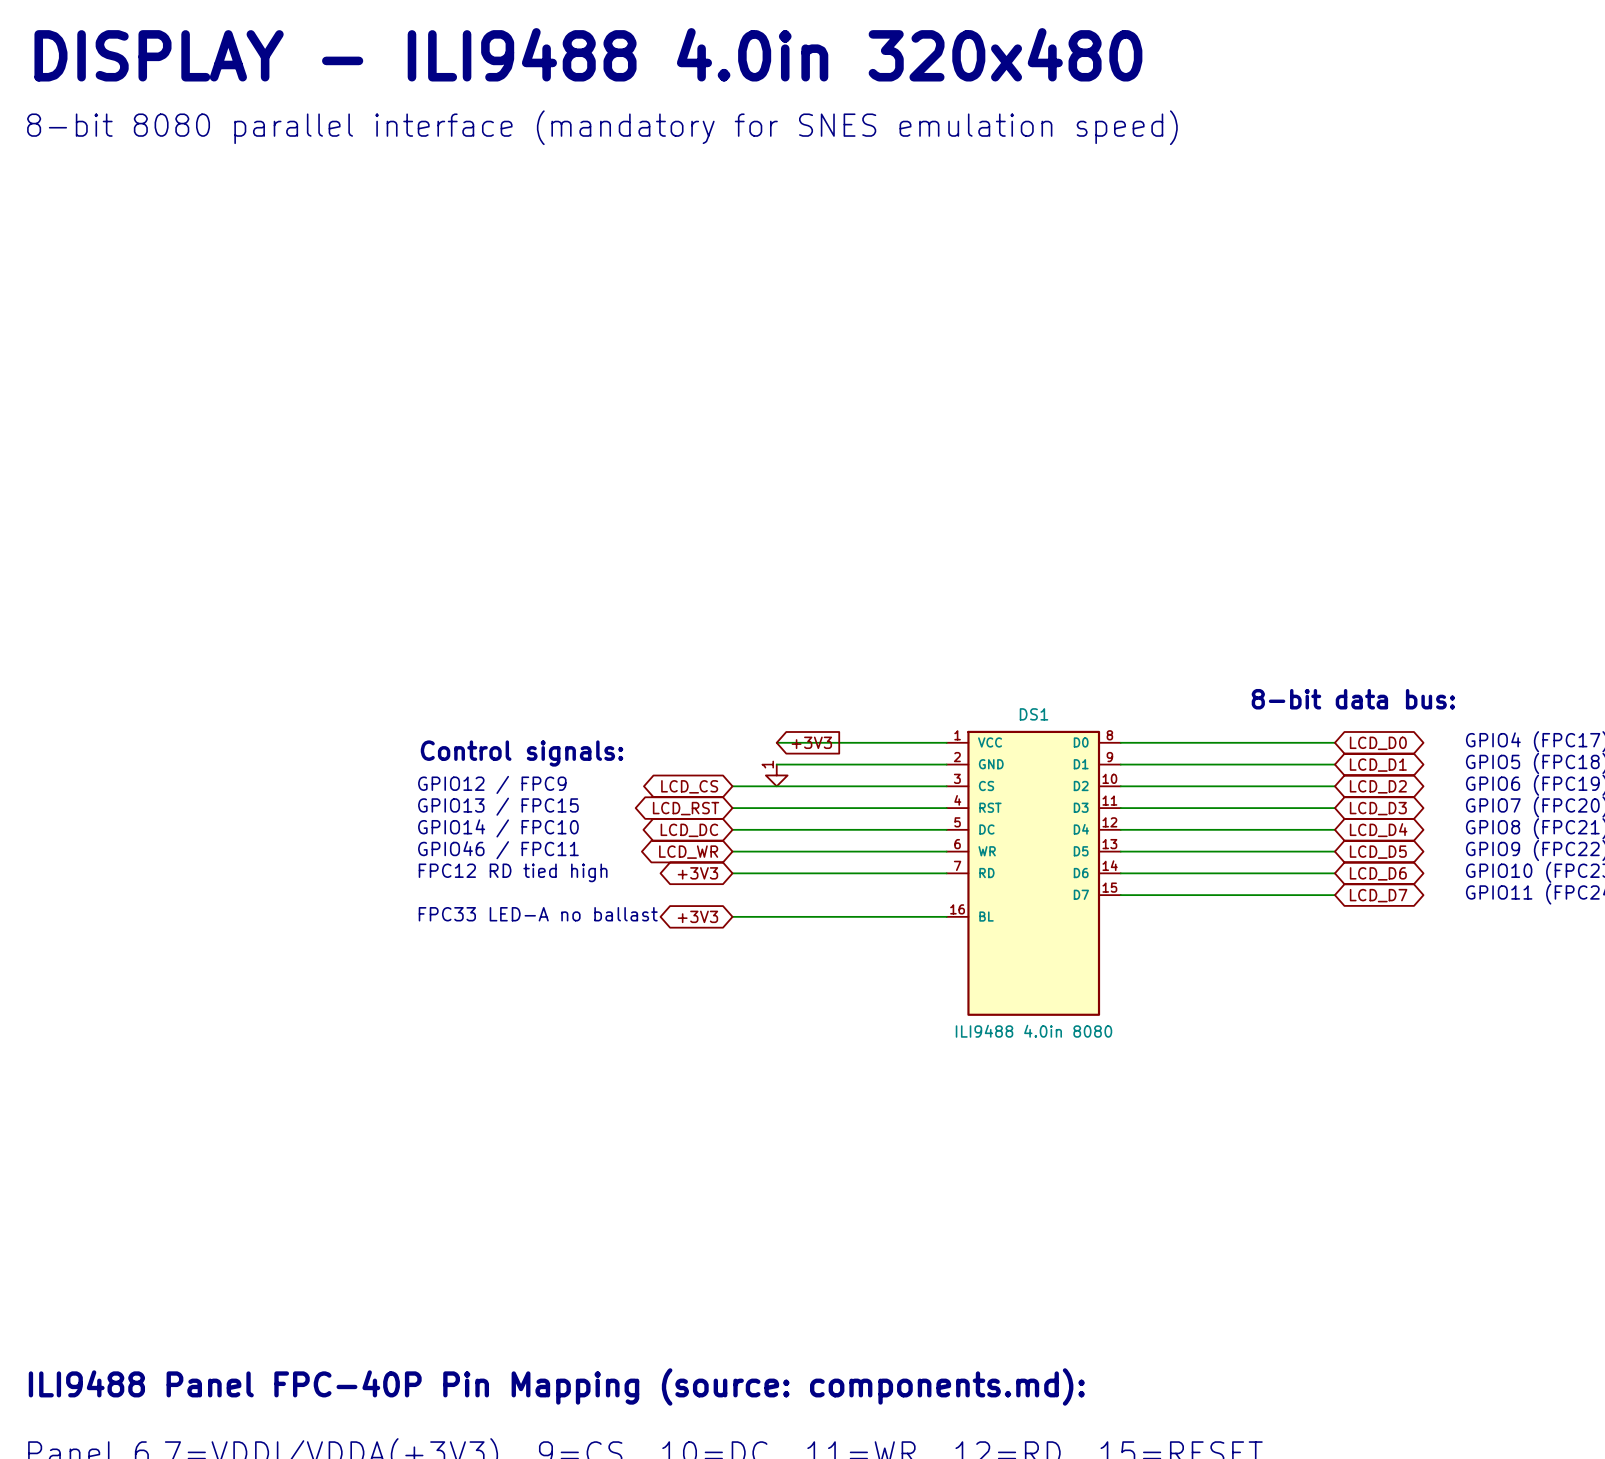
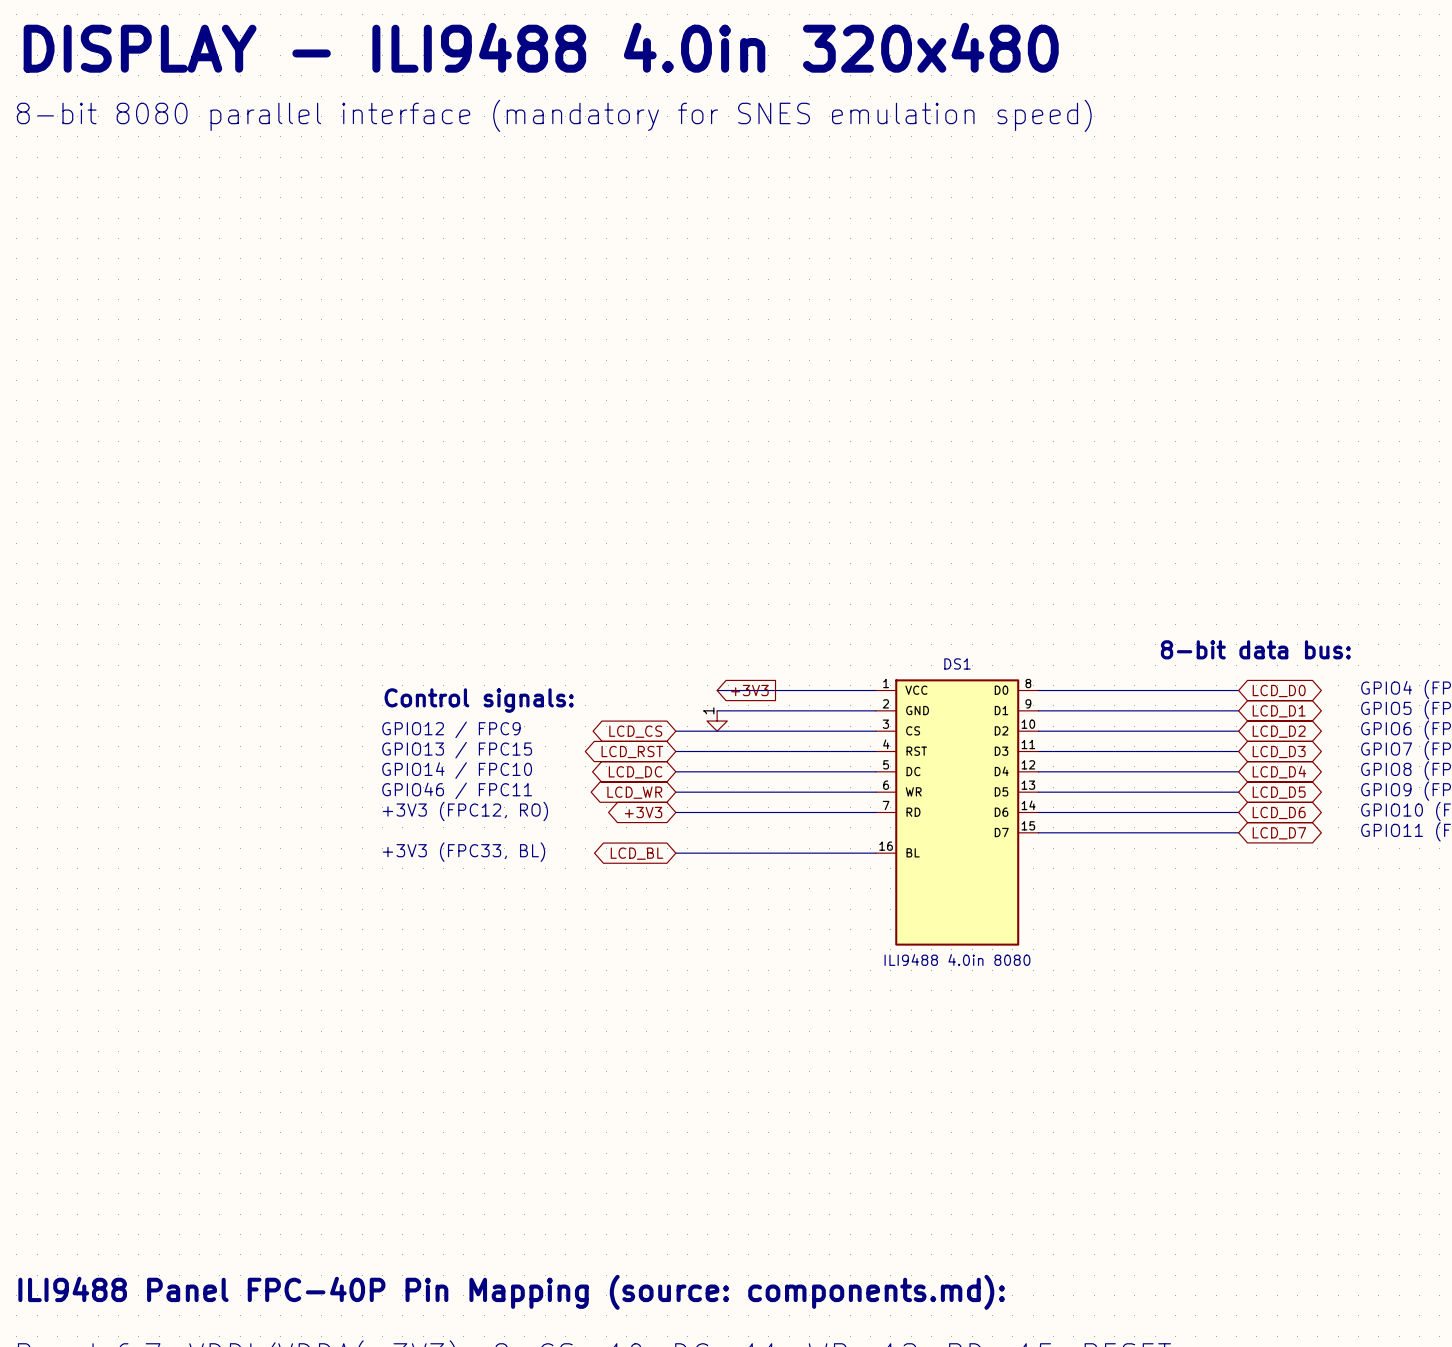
text: FPC12 RD tied high (513, 872) -> +3V3 (FPC12, RO) (465, 811)
text: FPC33 LED-A no ballast (538, 914) -> +3V3 (FPC33, BL) (463, 852)
global label: +3V3 (697, 916) -> LCD_BL (636, 853)

